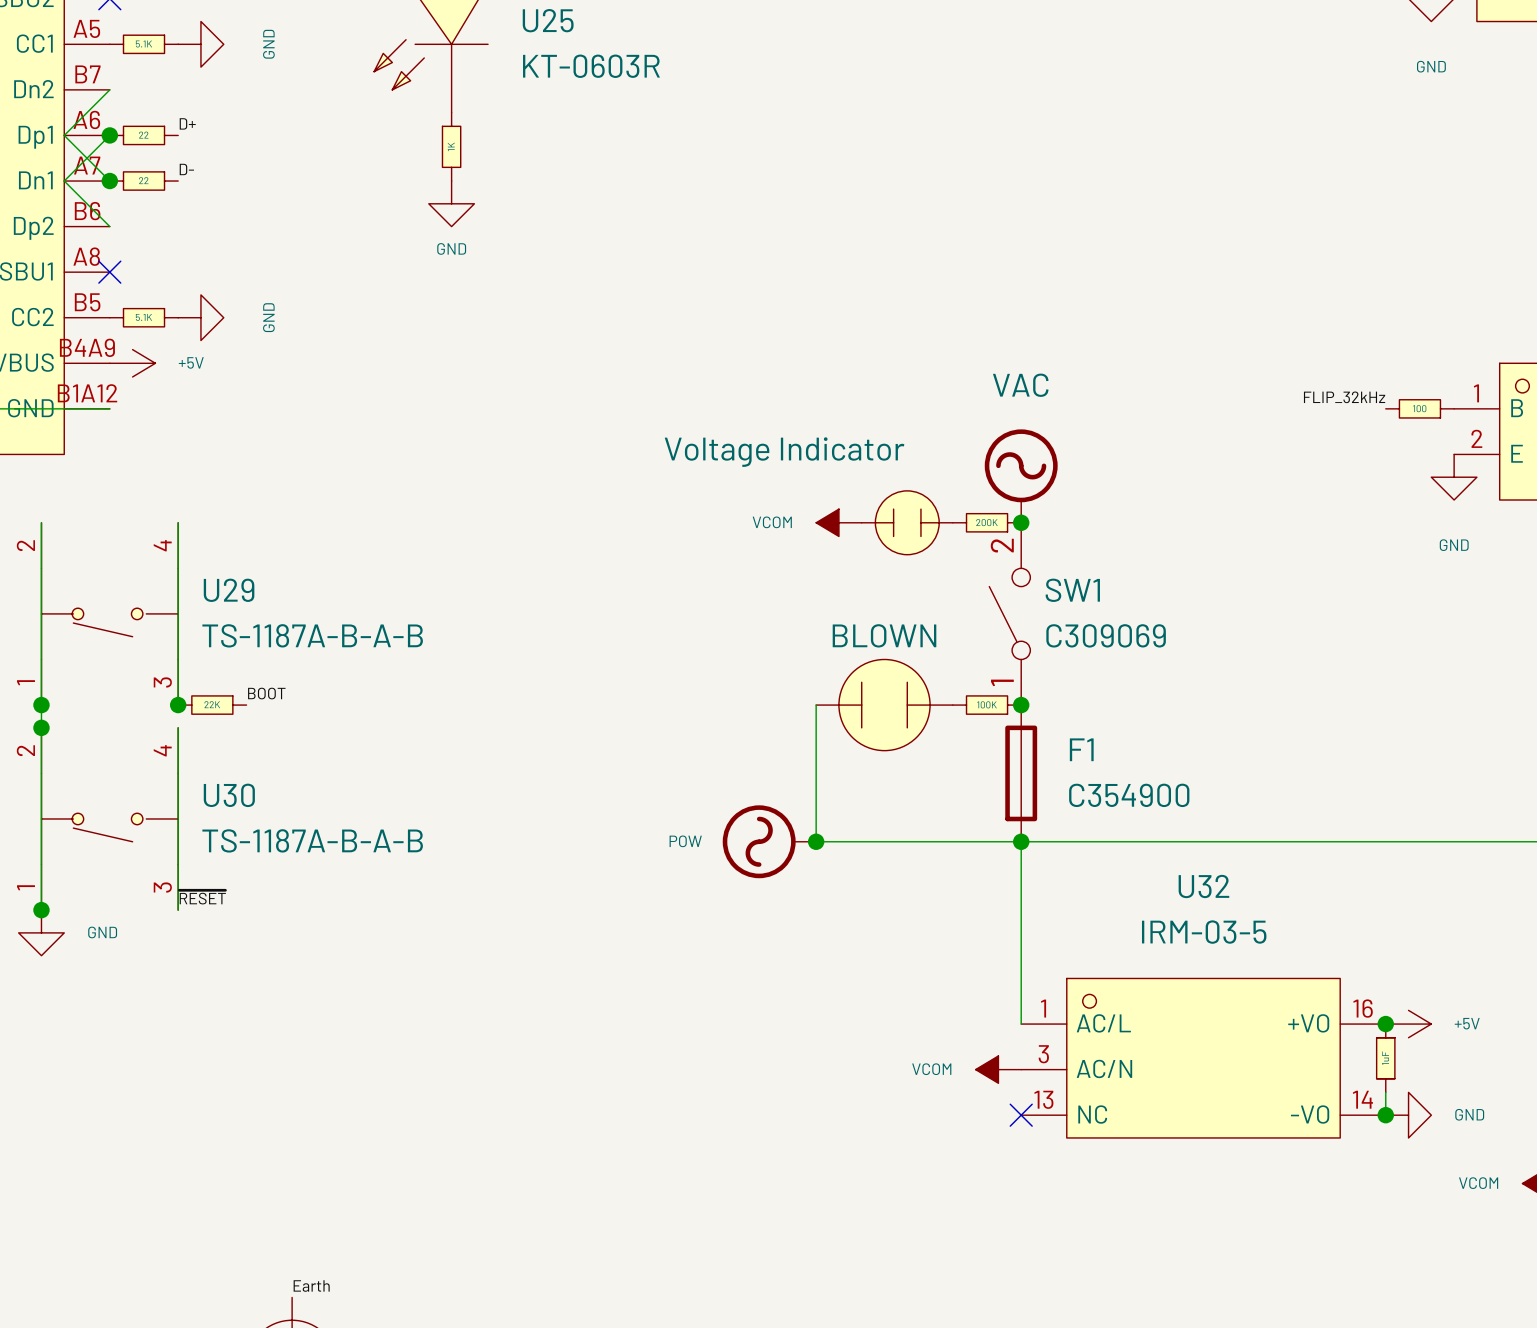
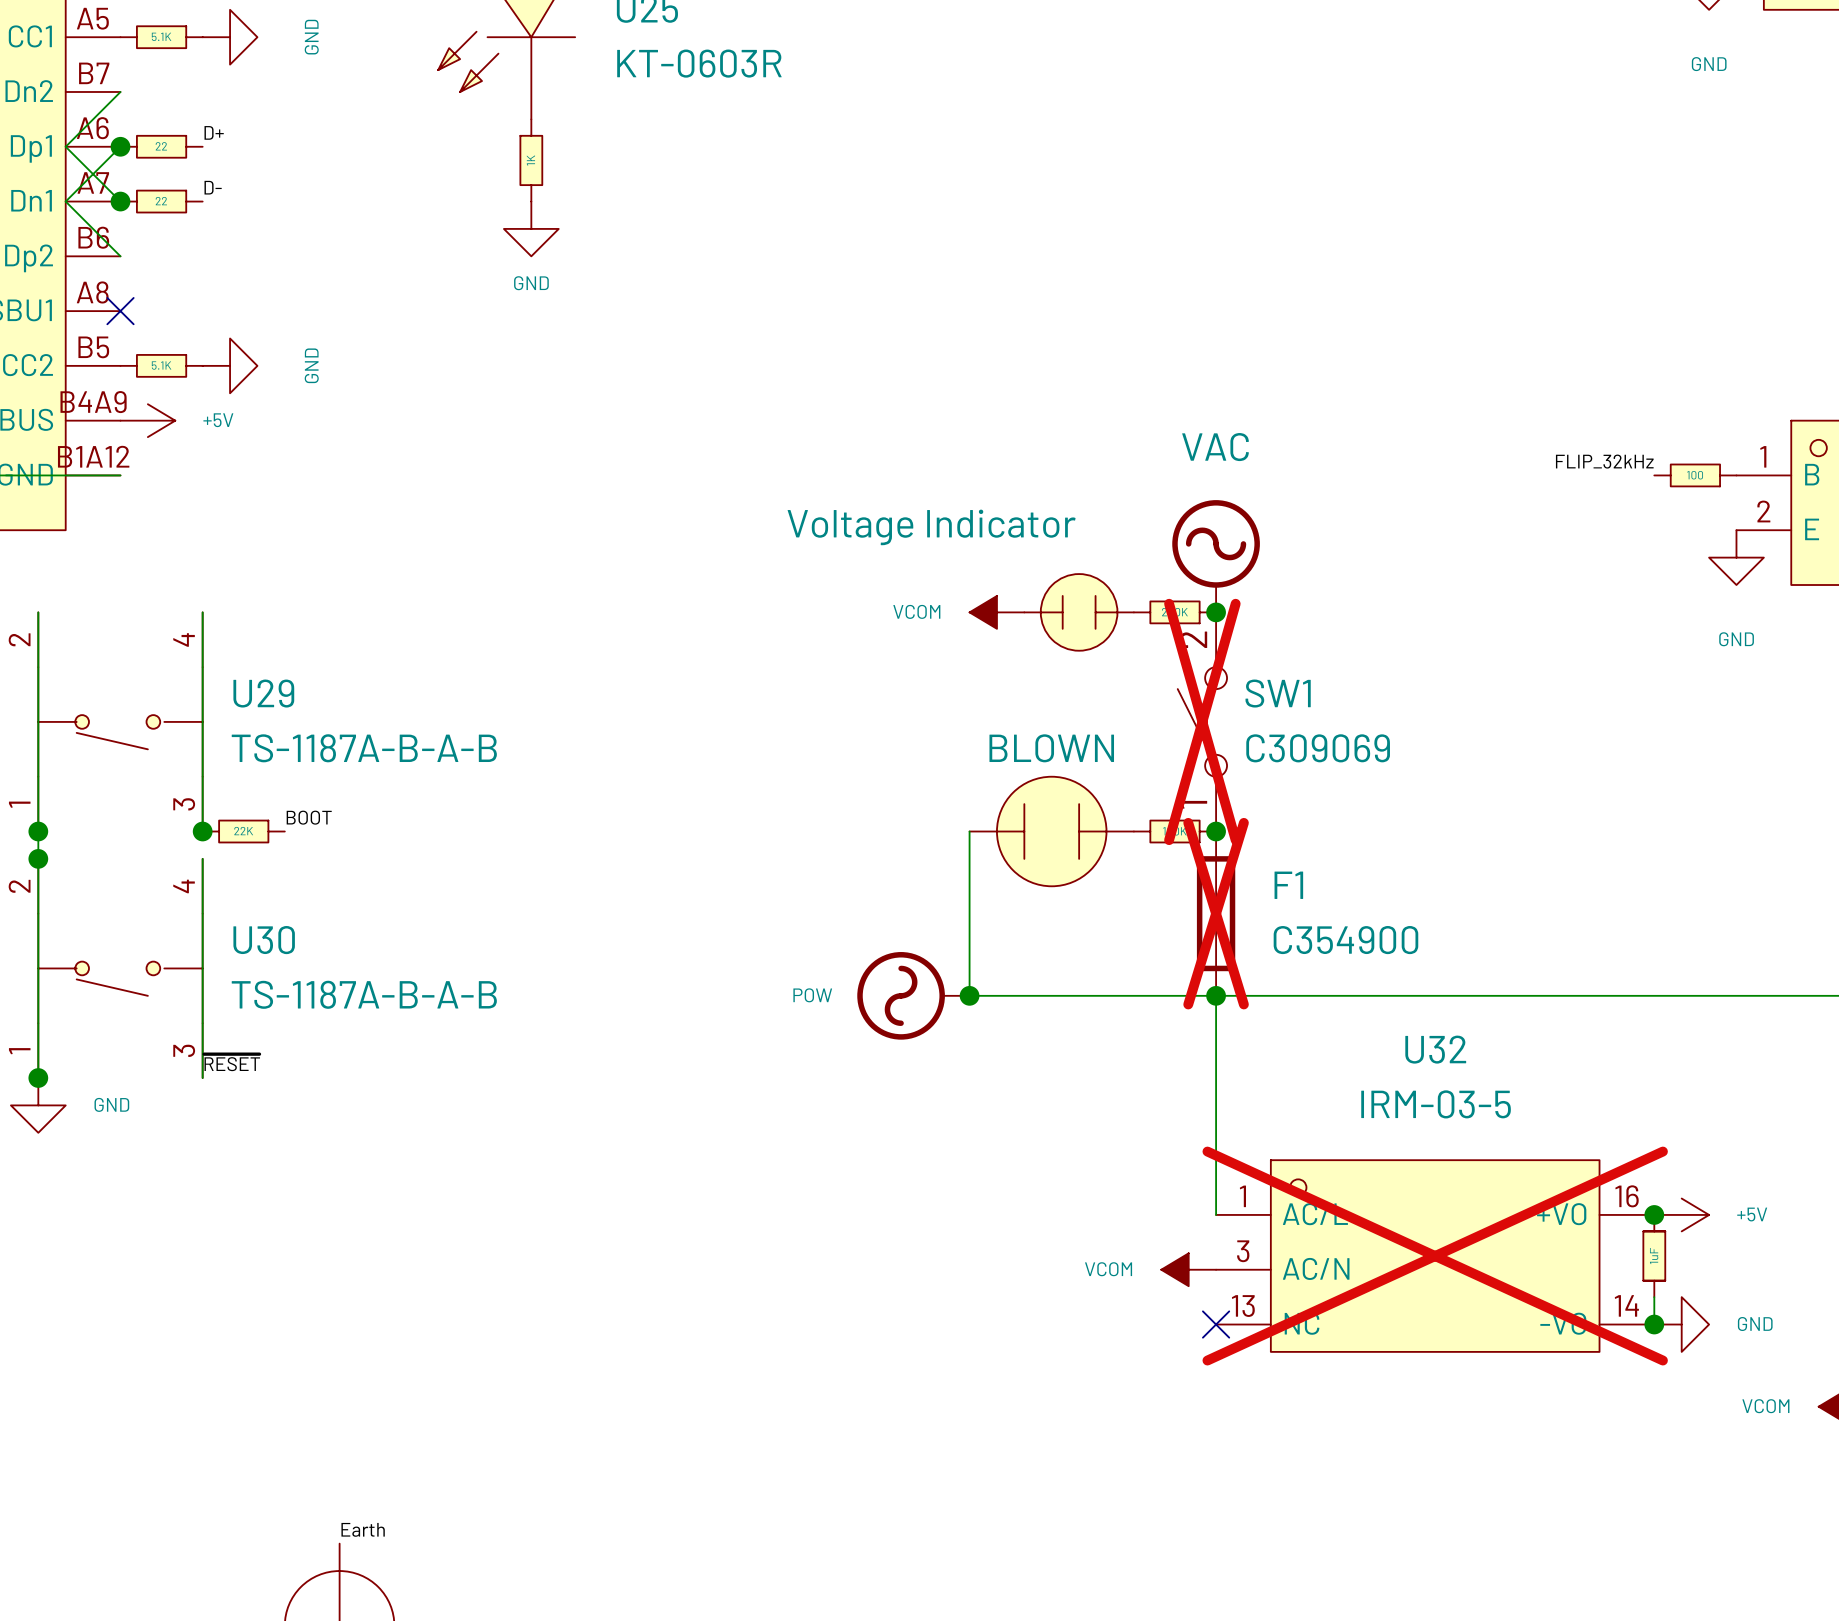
SW1 do-not-place cross: none -> (1202, 721)
F1 do-not-place cross: none -> (1216, 913)
U32 do-not-place cross: none -> (1435, 1256)

